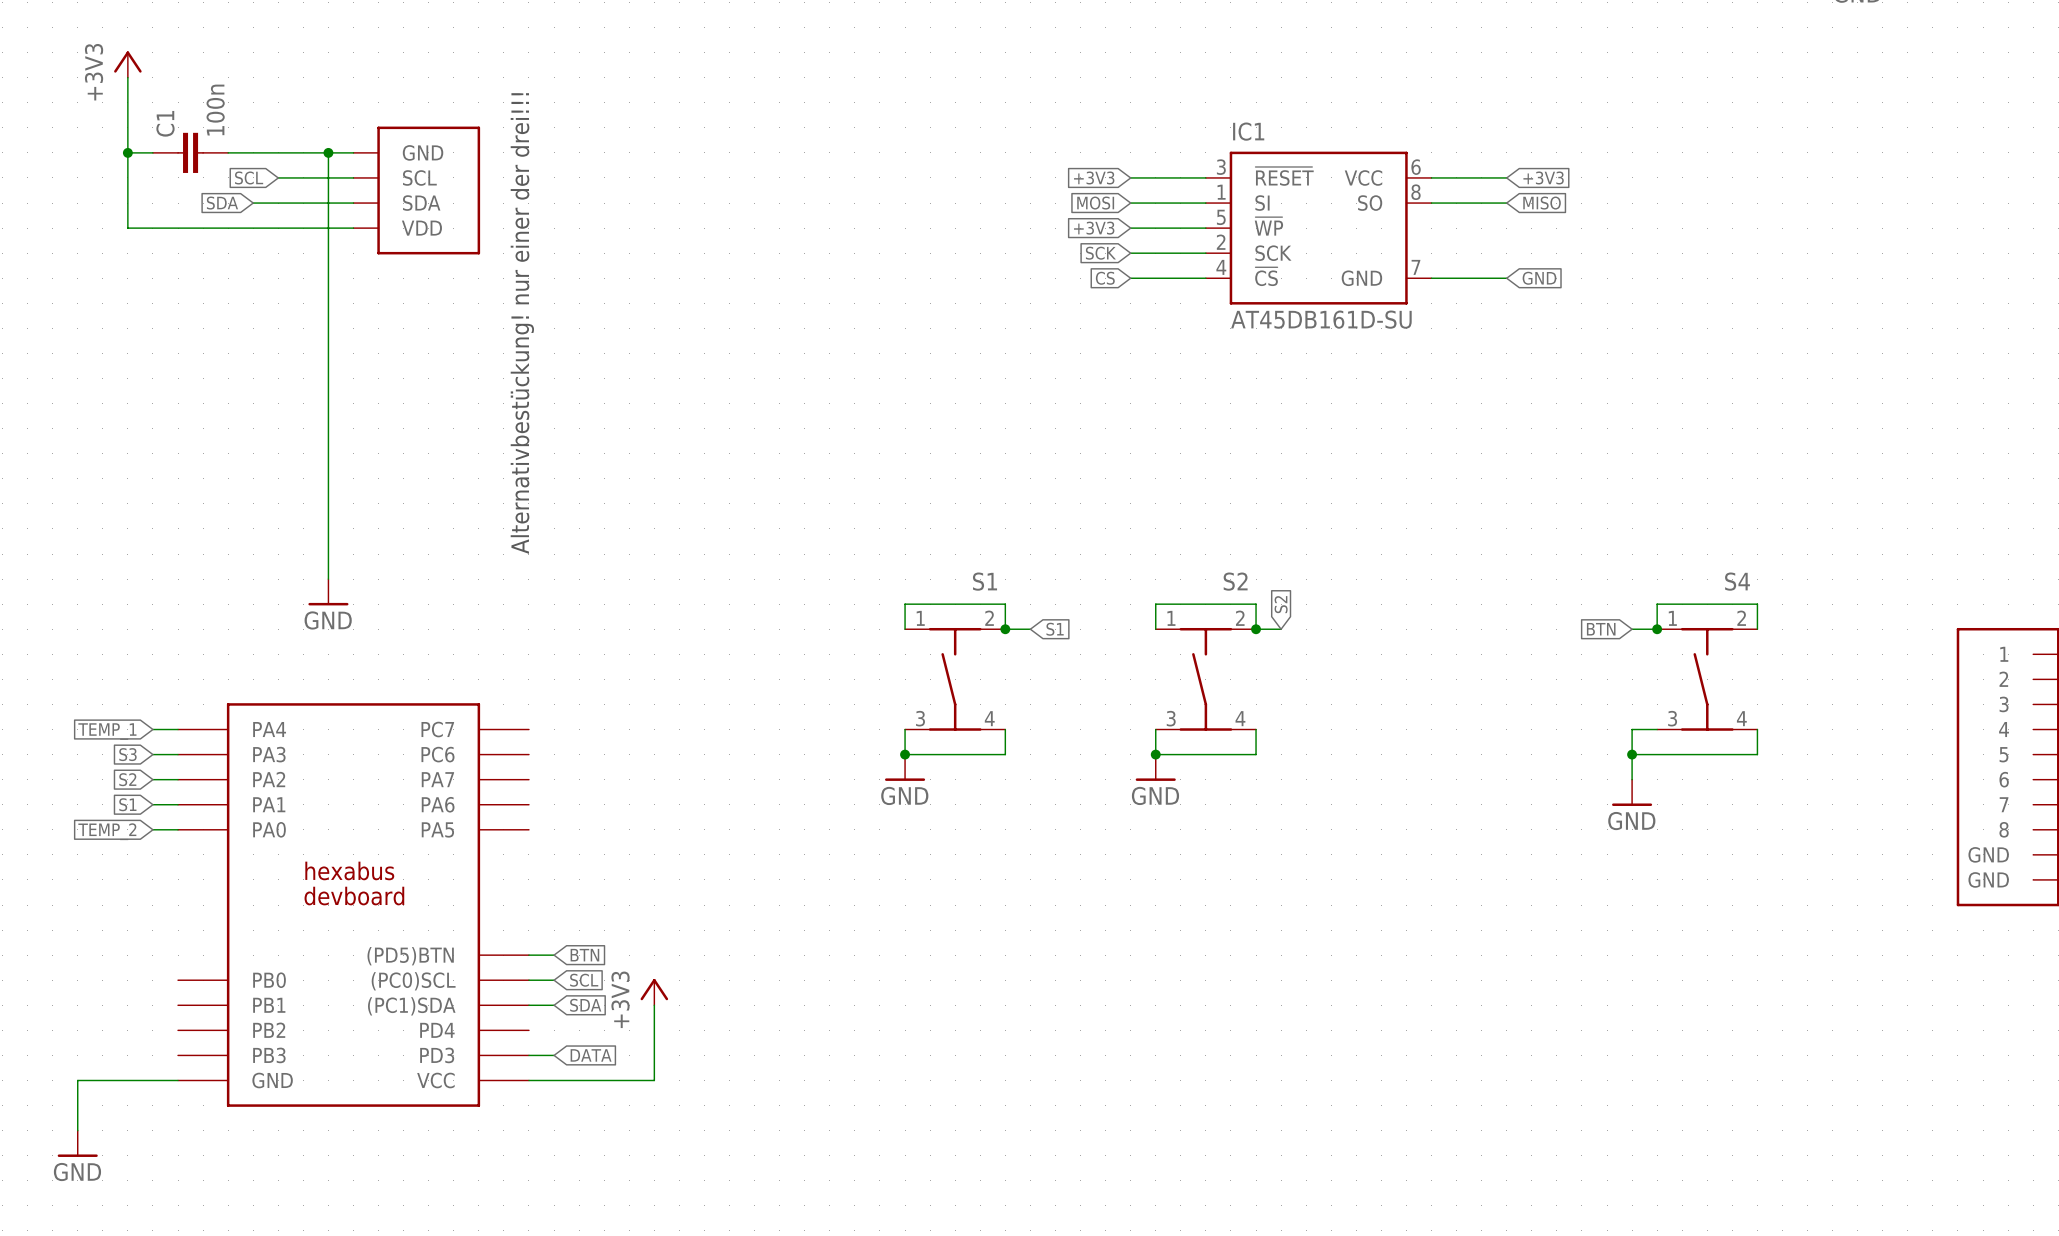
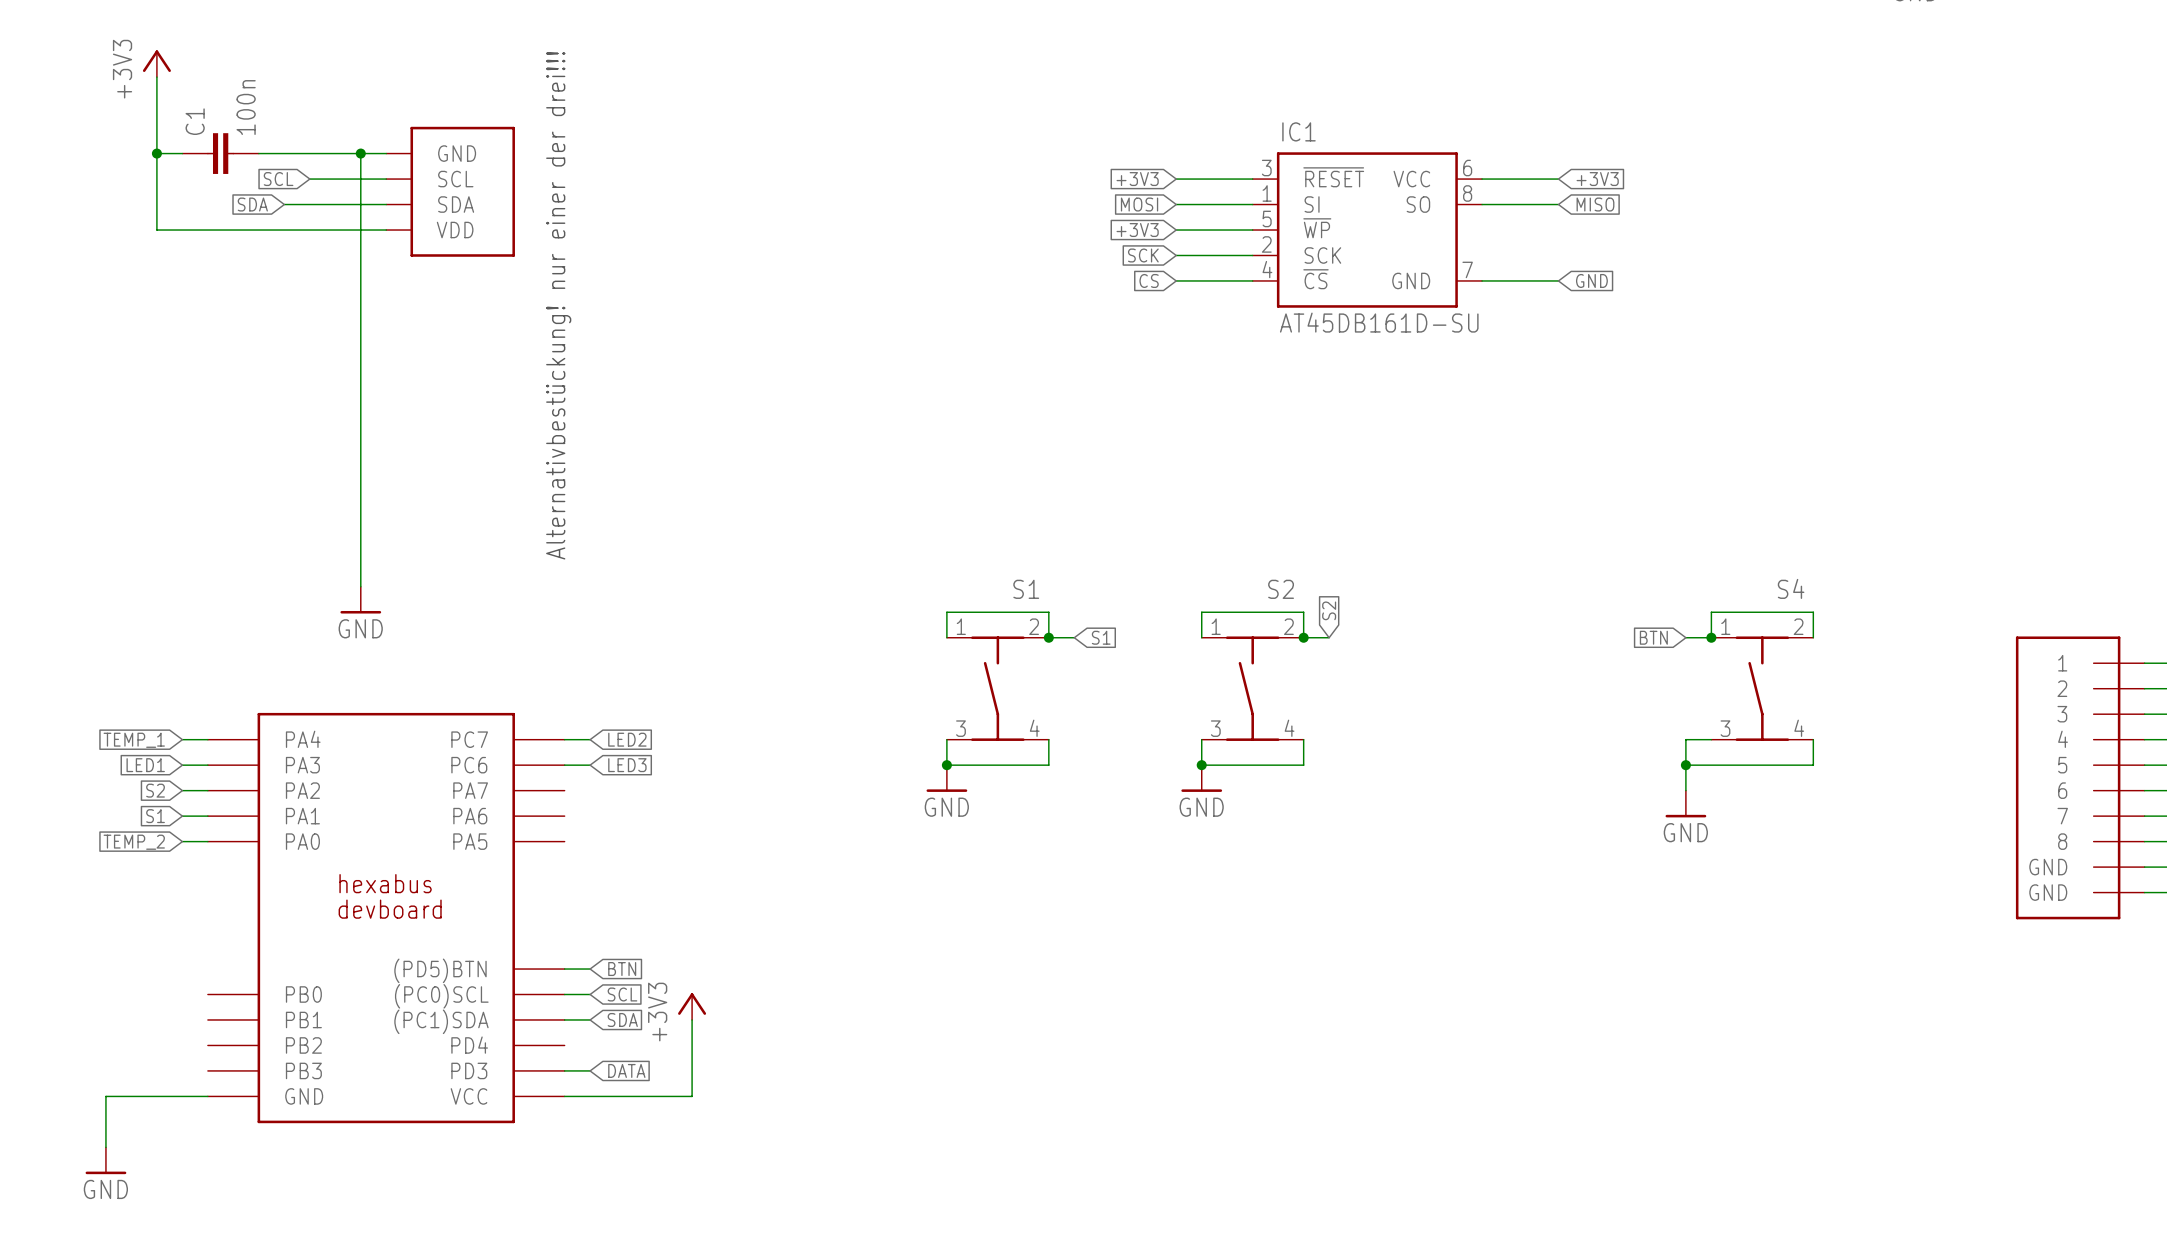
wire: none -> (564, 739) (590, 739)
global label: none -> LED2 (627, 739)
global label: S3 (127, 754) -> LED1 (145, 765)
wire: none -> (564, 765) (590, 765)
global label: none -> LED3 (627, 765)

